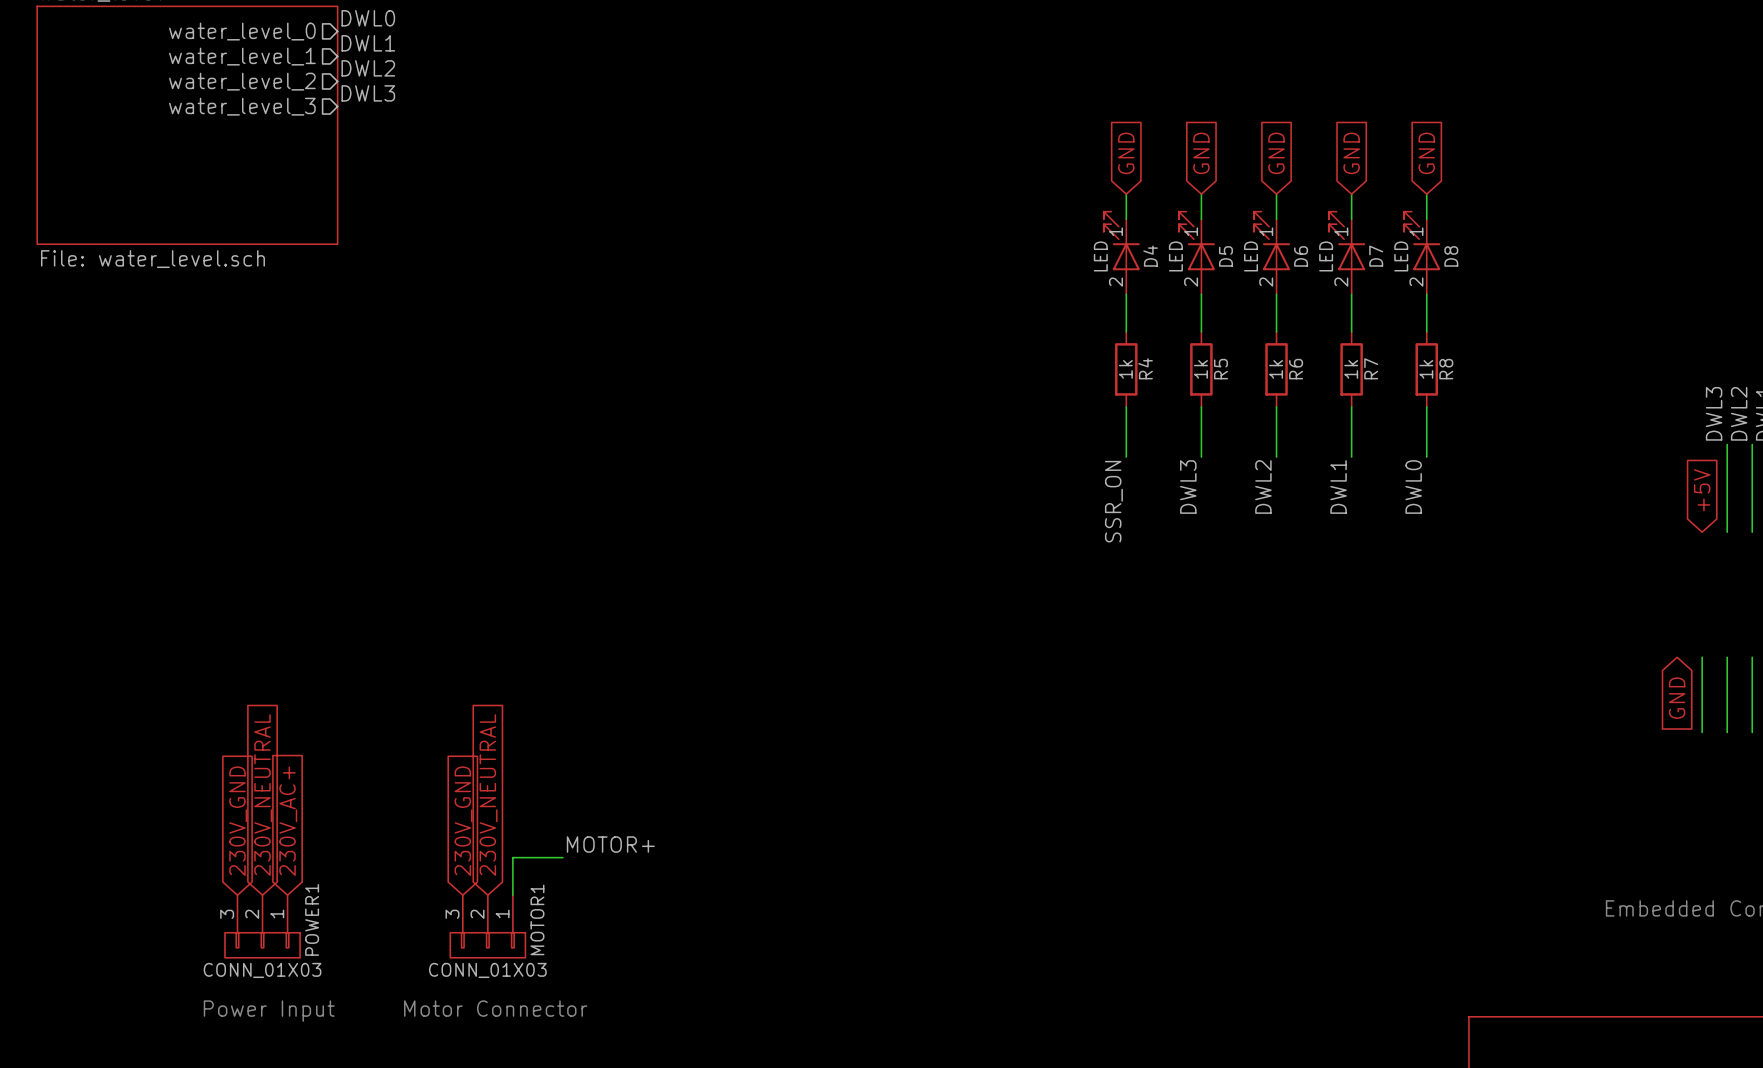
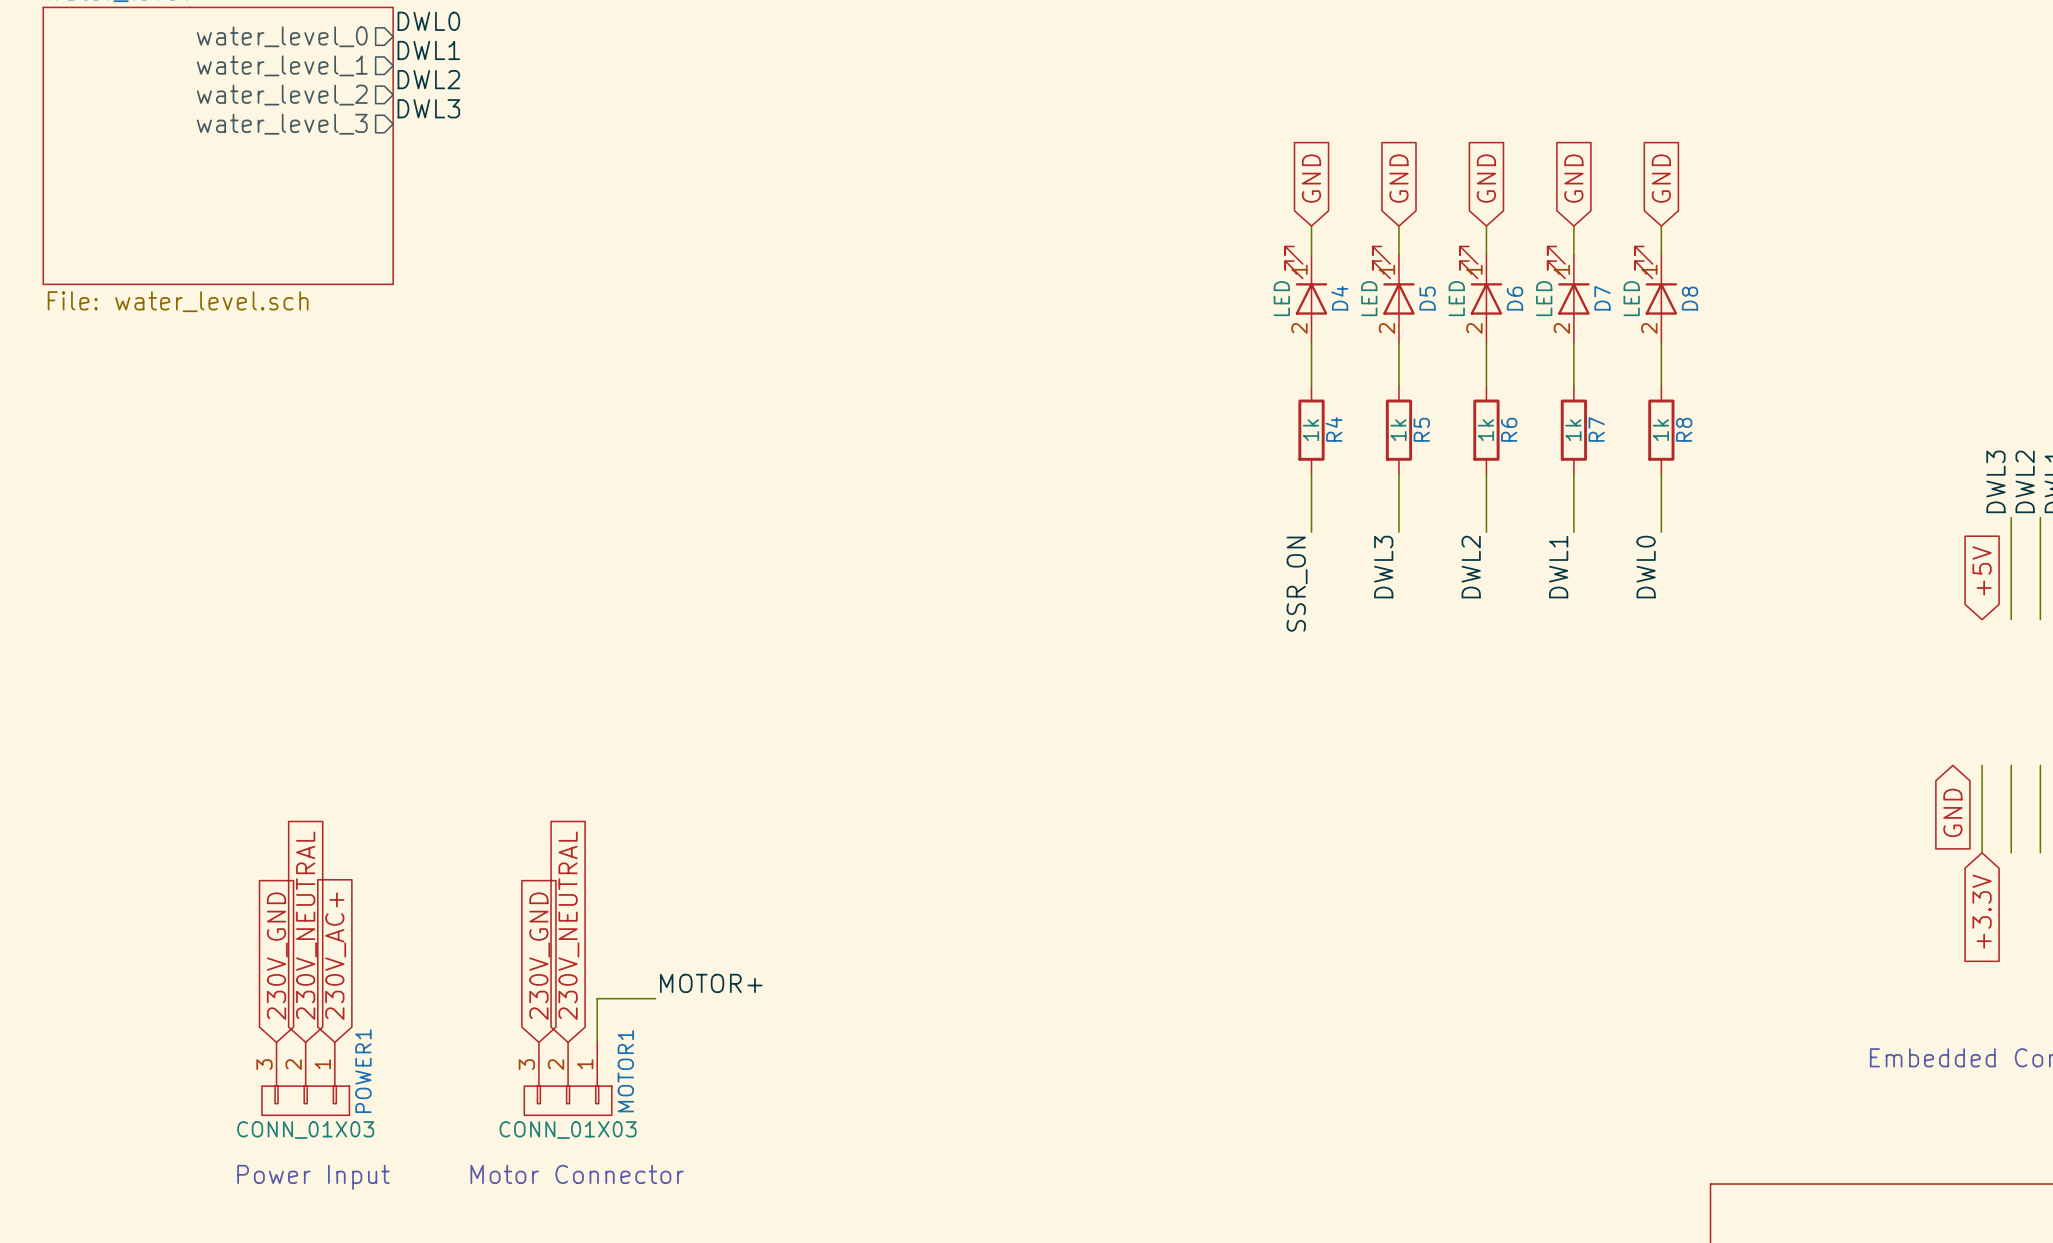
global label: none -> +3.3V (1982, 911)

